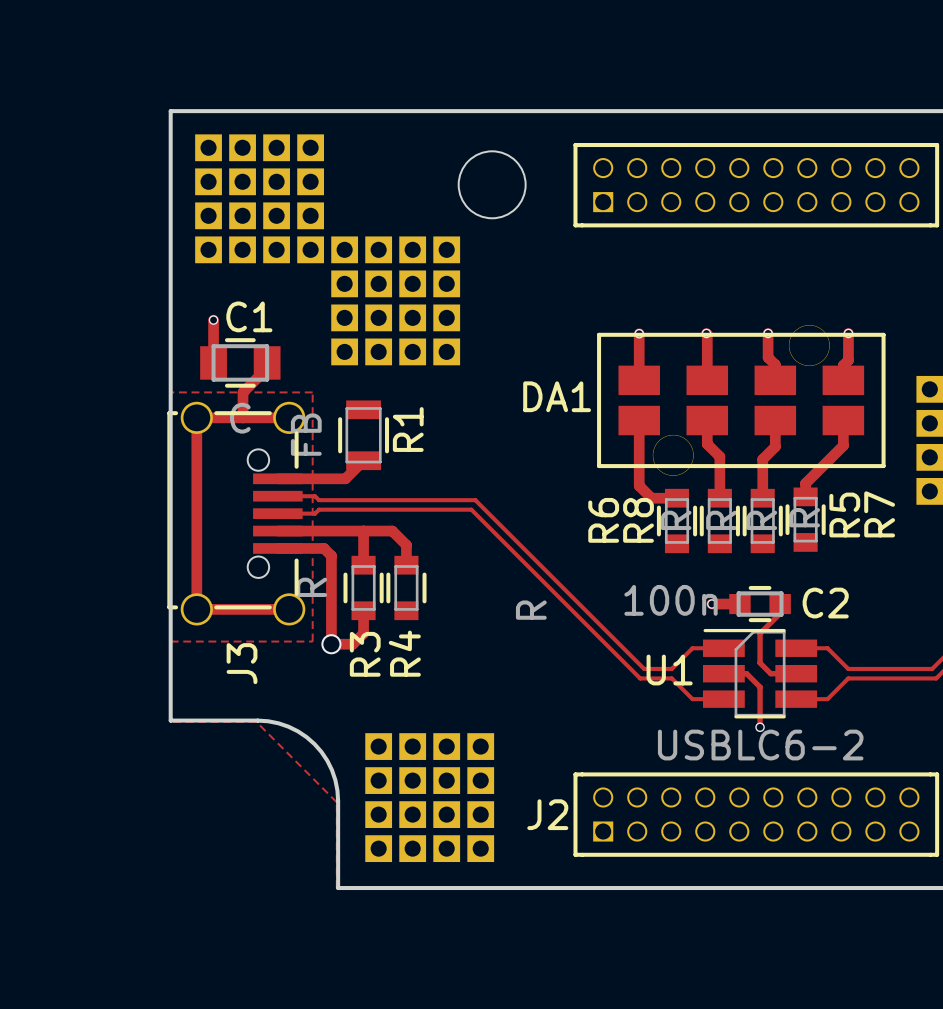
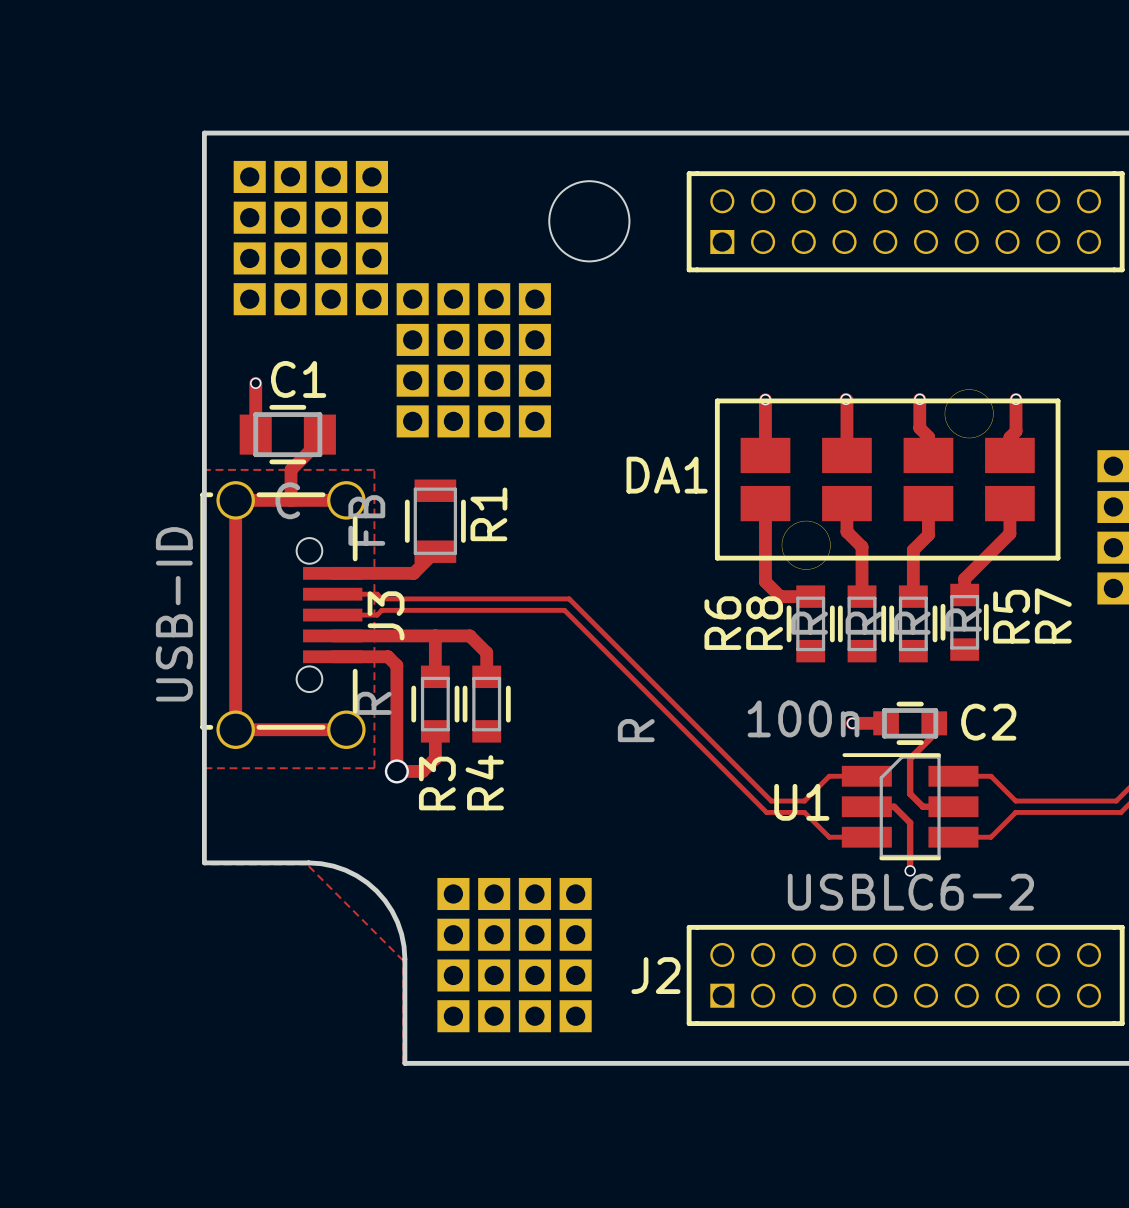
J3 value: none -> USB-ID (174, 614)
J3 name position: J3 (242, 663) -> J3 (386, 615)

